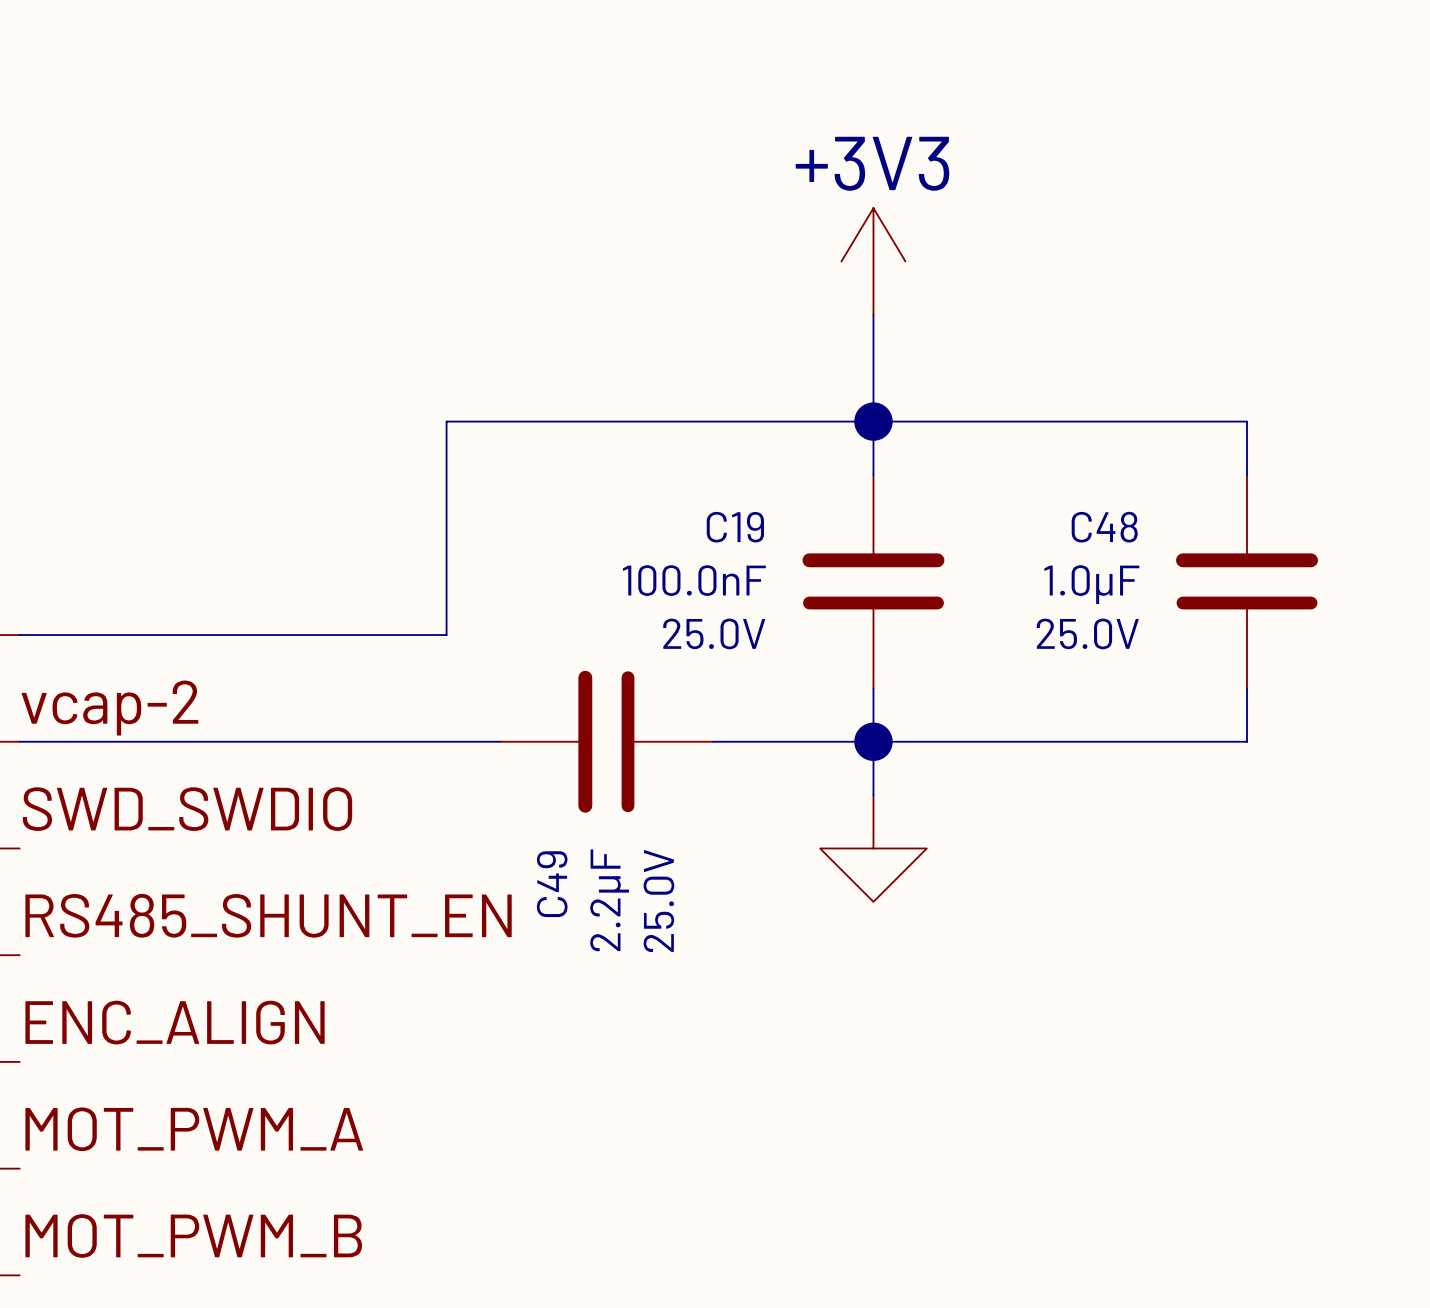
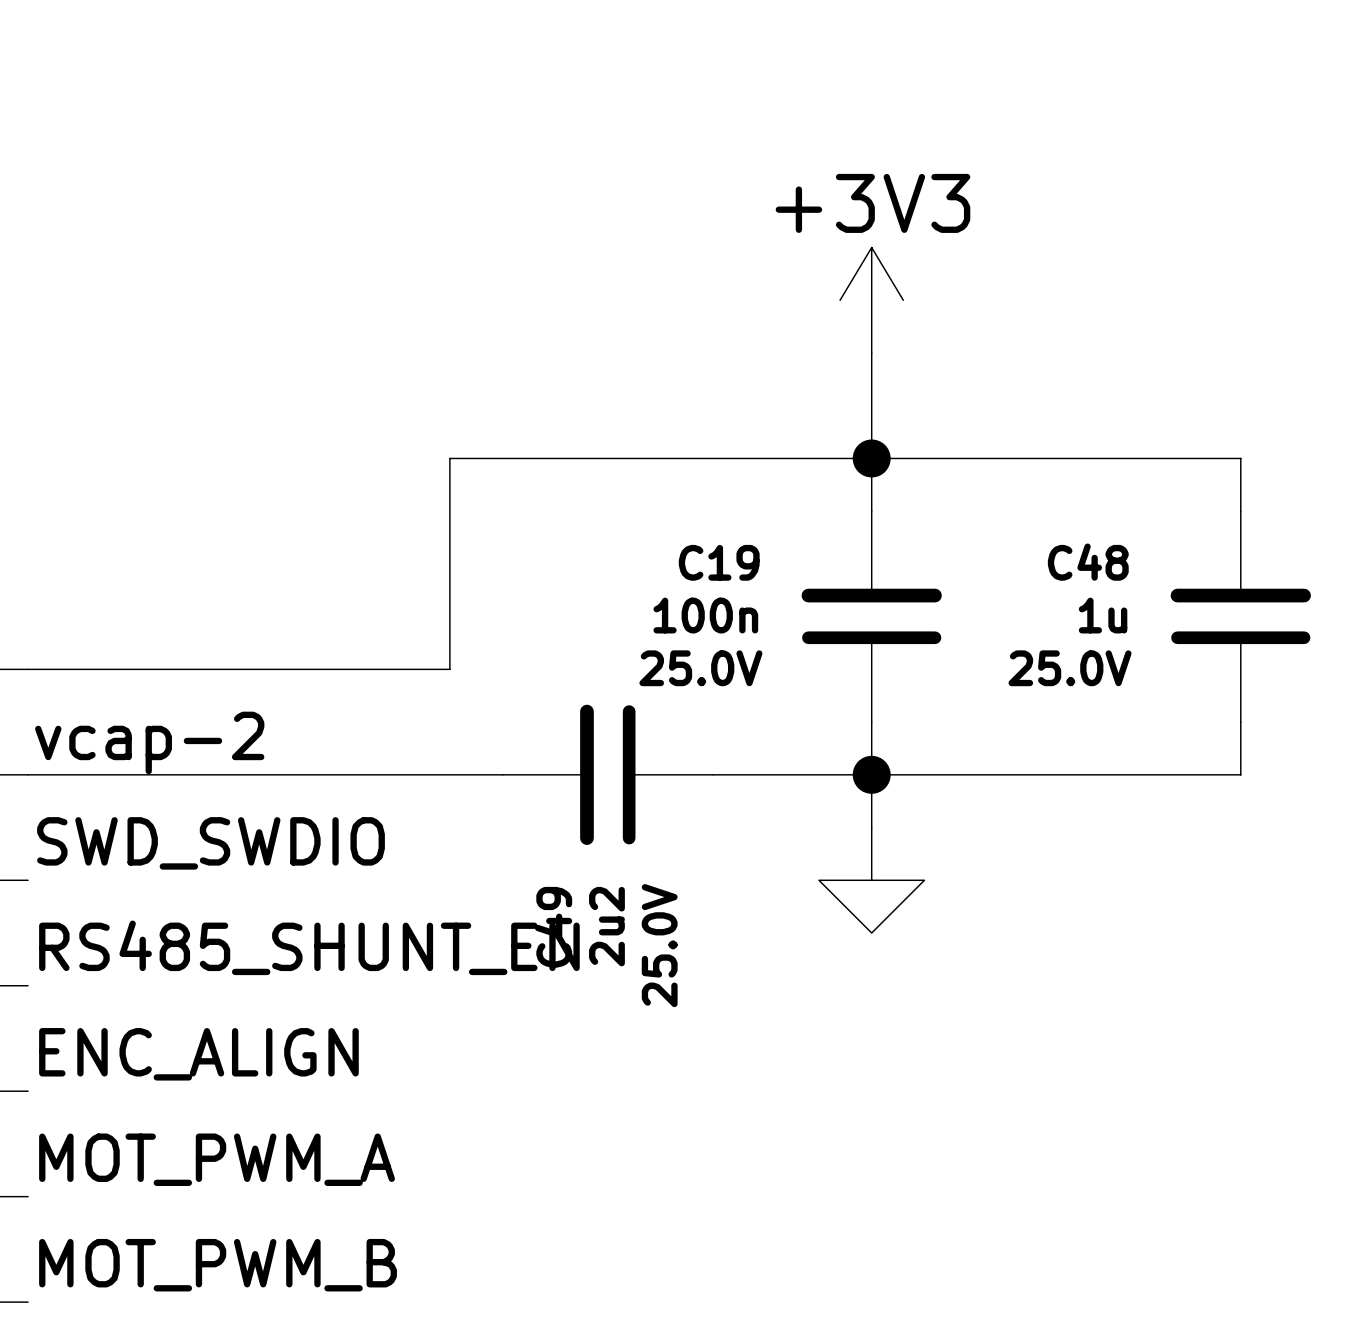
C19 value: 100.0nF (694, 580) -> 100n (705, 615)
C48 value: 1.0μF (1091, 584) -> 1u (1103, 615)
C49 value: 2.2μF (609, 900) -> 2u2 (606, 926)

